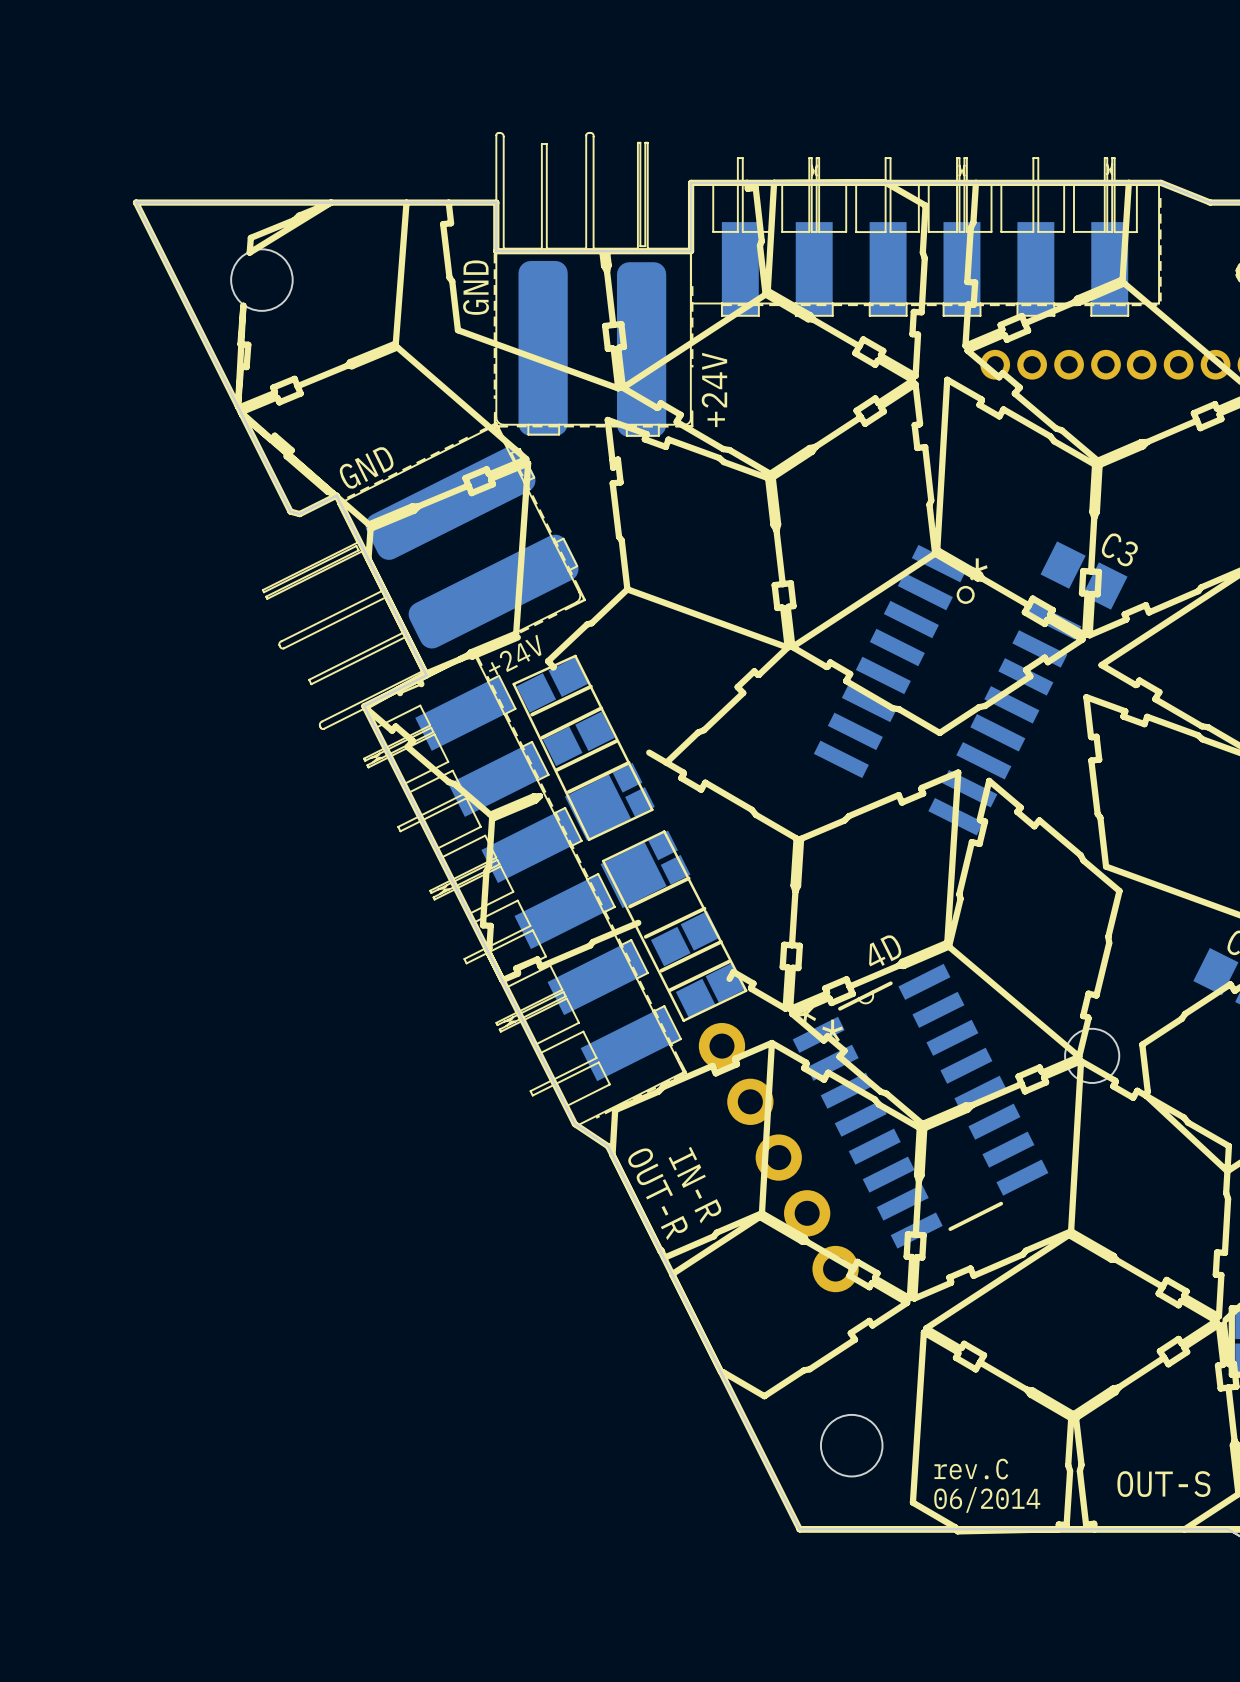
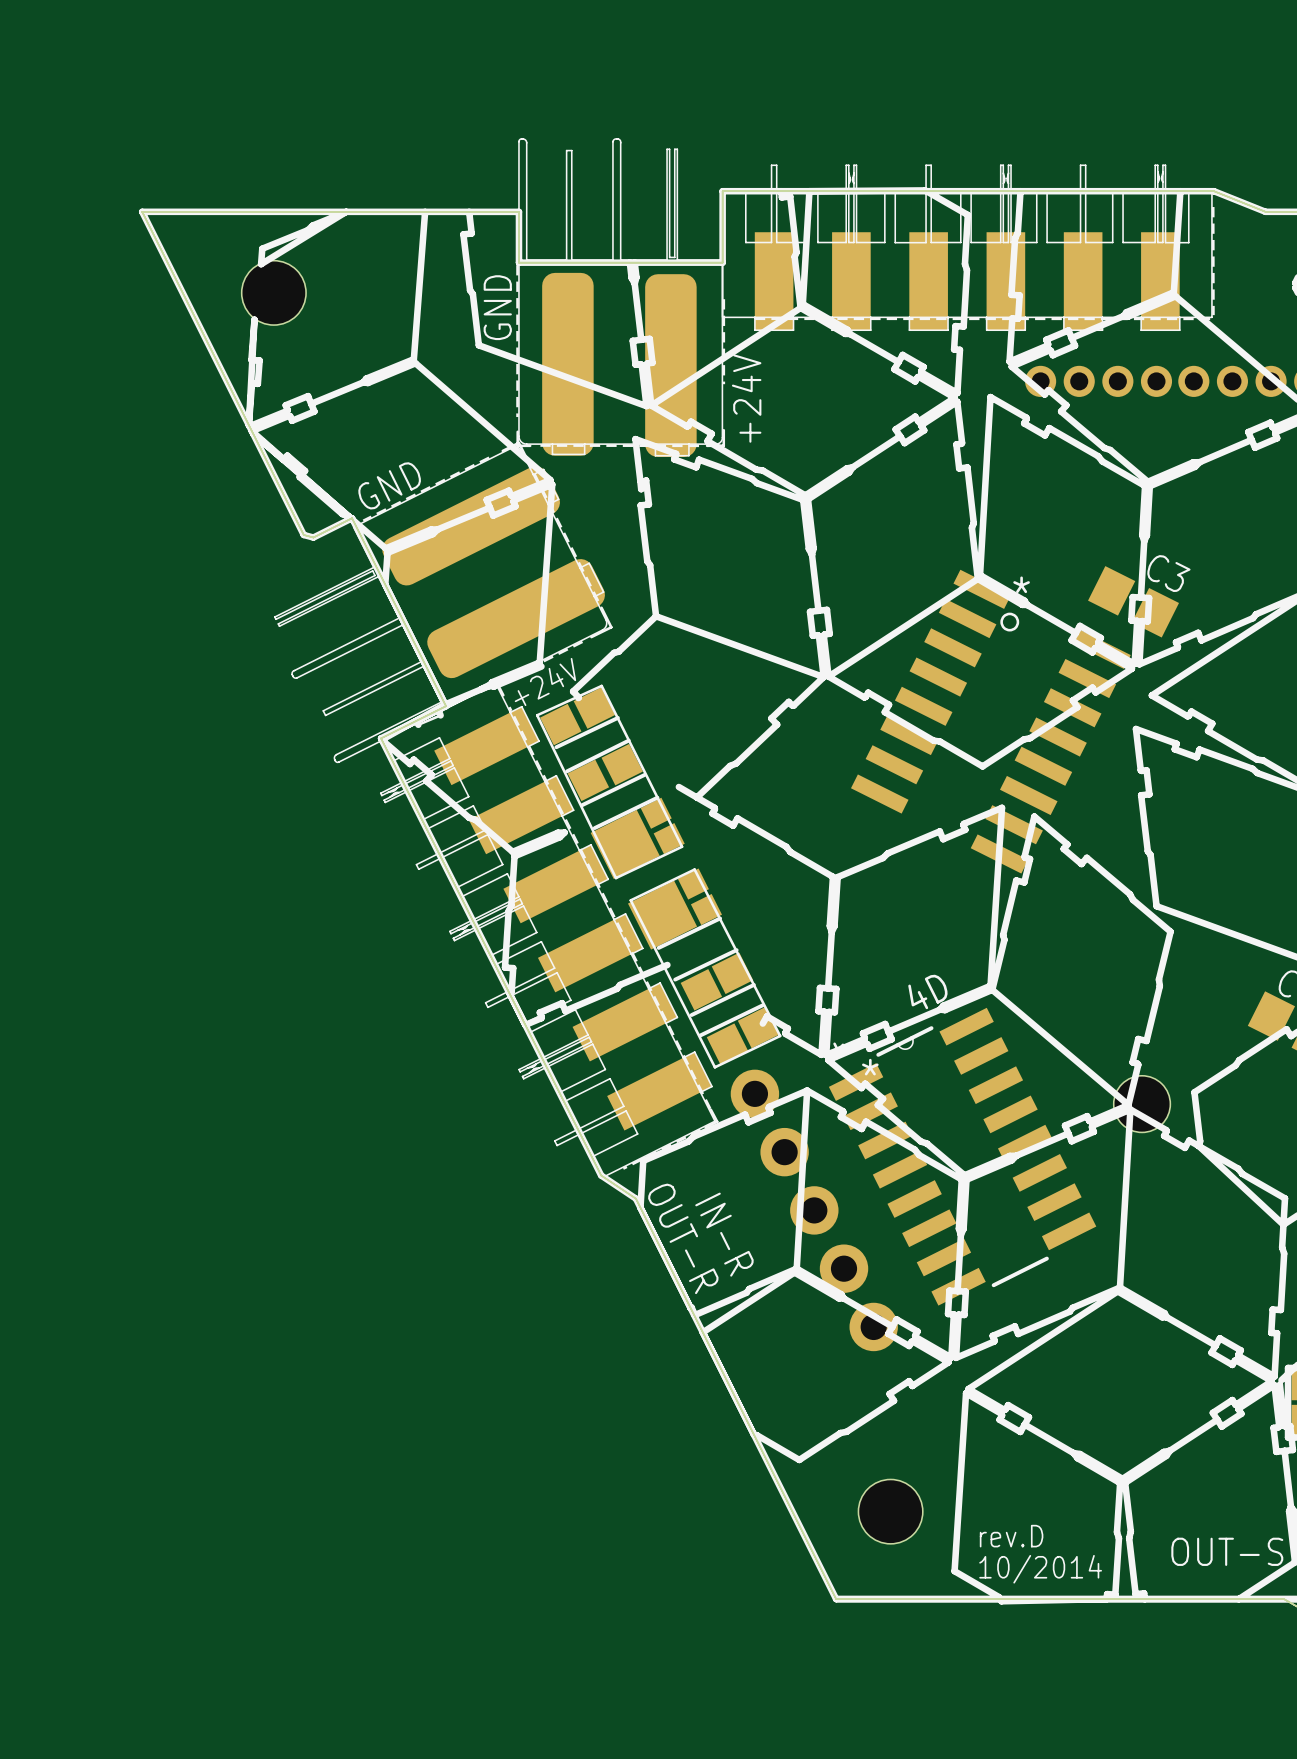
text: rev.C (971, 1469) -> rev.D (1011, 1536)
text: 06/2014 (987, 1499) -> 10/2014 (1040, 1569)

